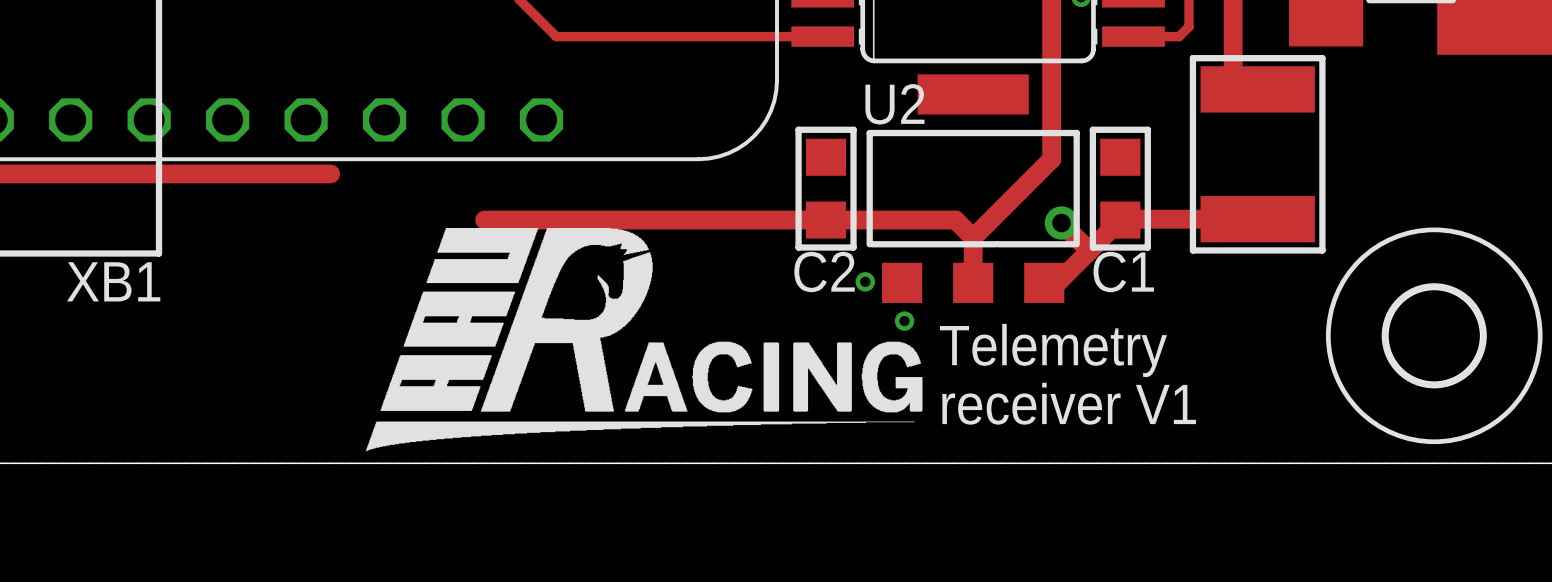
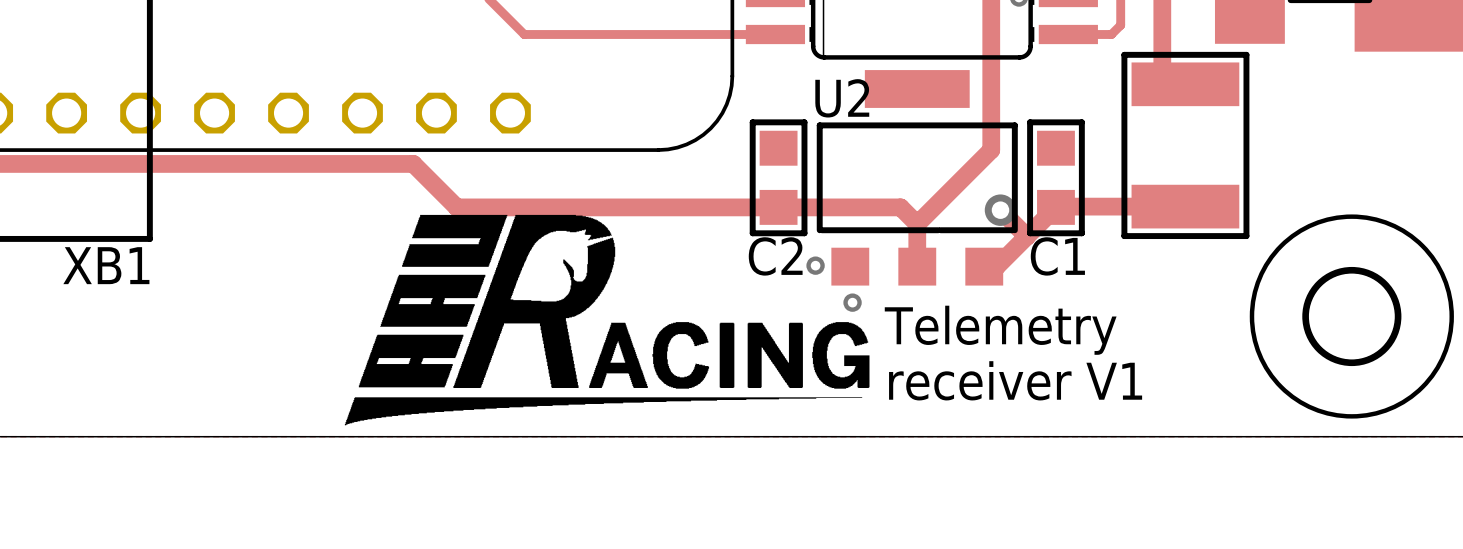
track: none -> (311, 163) (413, 163) (456, 207)

